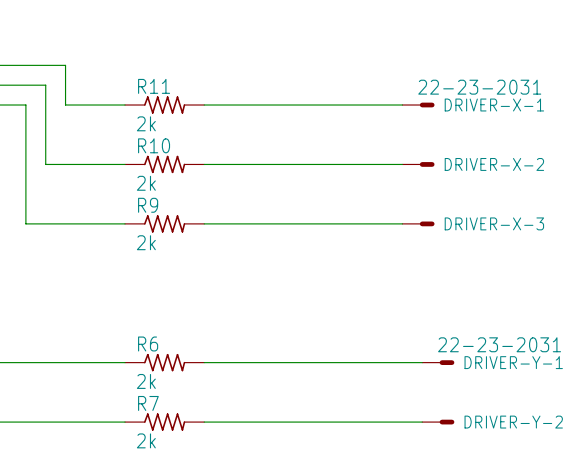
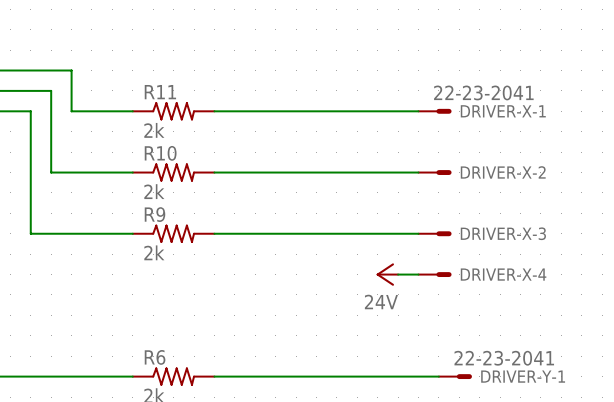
DRIVER-X-1 value: 22-23-2031 (479, 87) -> 22-23-2041 (483, 92)
power symbol: none -> 24V (387, 274)
wire: none -> (398, 274) (418, 274)
DRIVER-X-4: none -> (435, 274)
DRIVER-Y-1 value: 22-23-2031 (499, 344) -> 22-23-2041 (504, 358)

